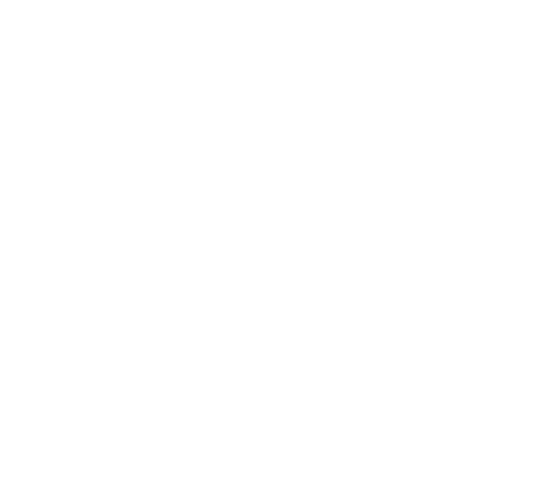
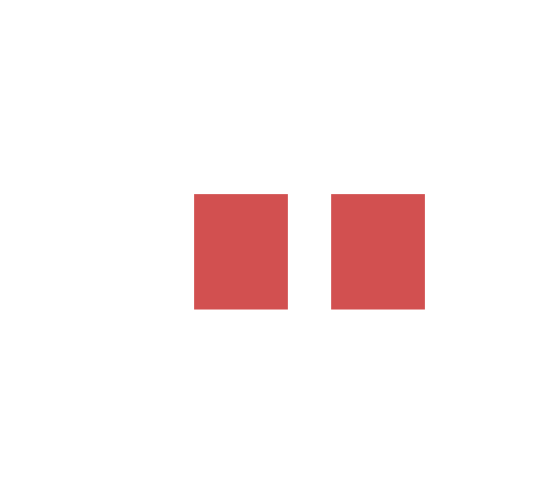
part: none -> (309, 251)

